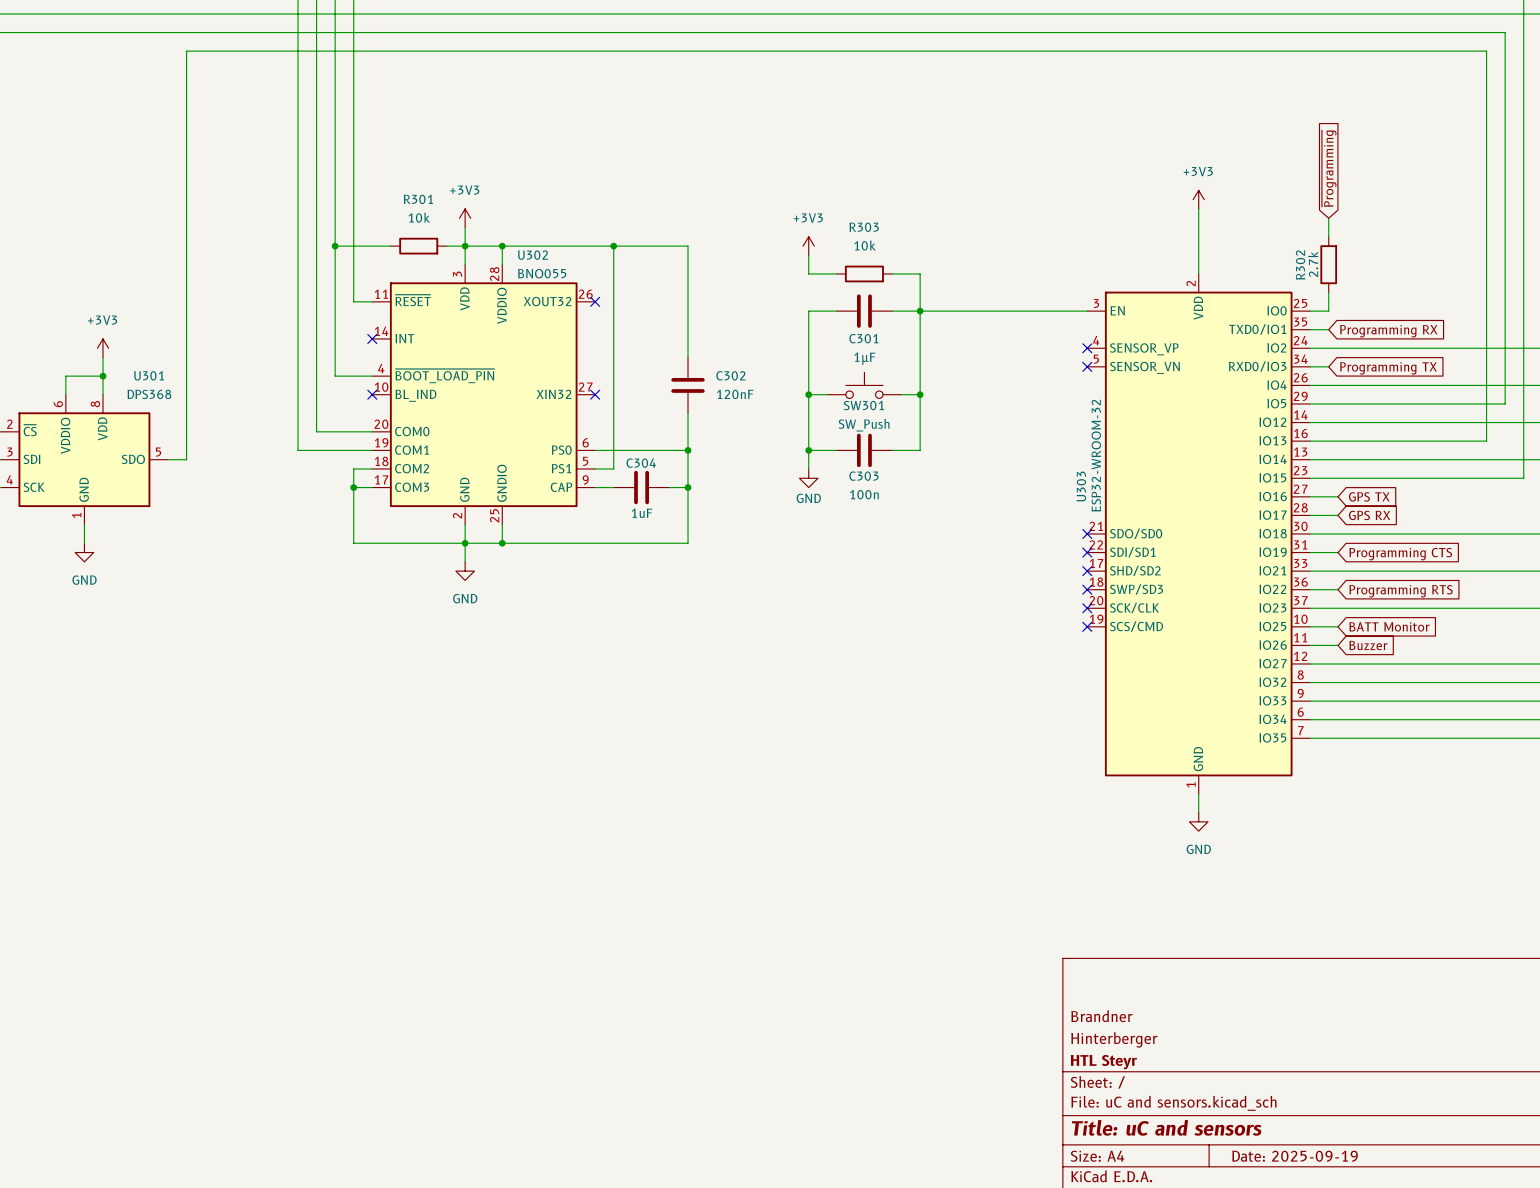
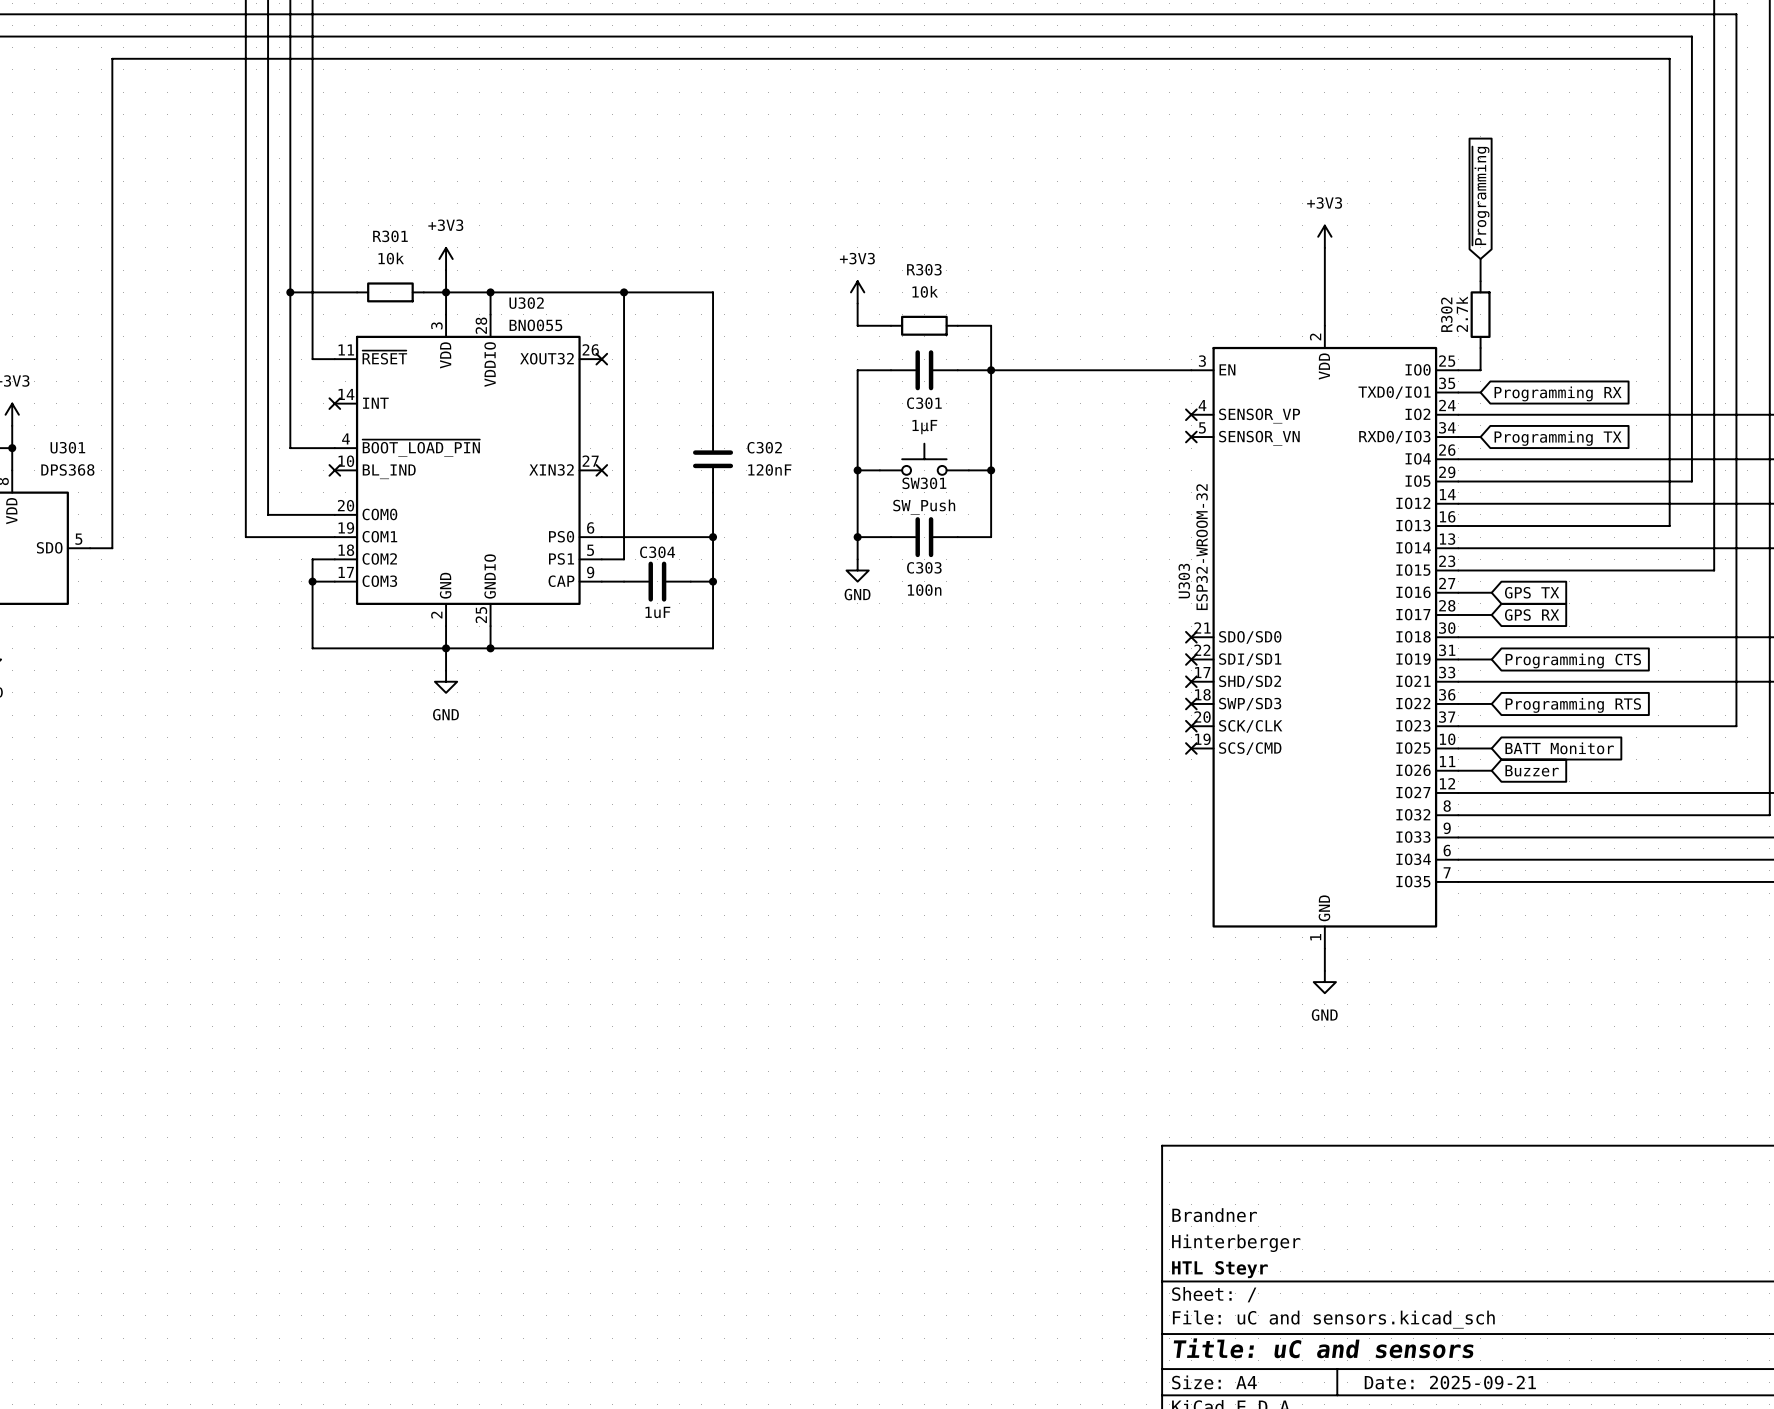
title block: Date: 2025-09-19 (1295, 1156) -> Date: 2025-09-21 (1450, 1382)

